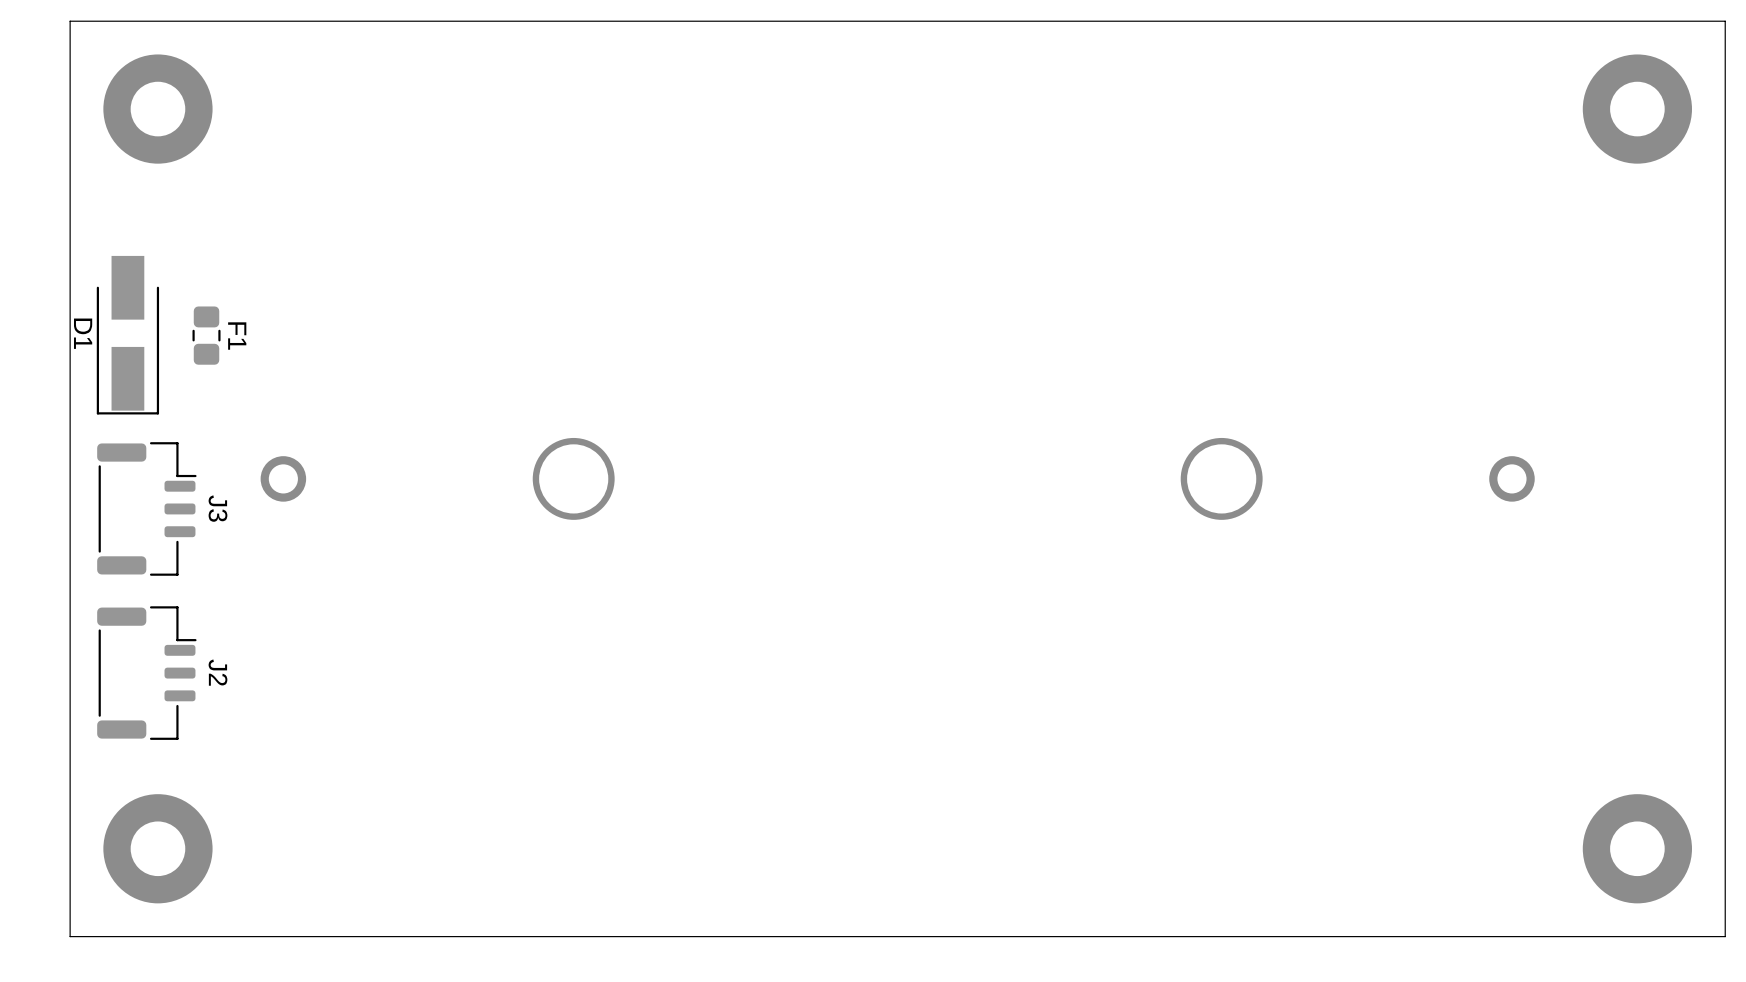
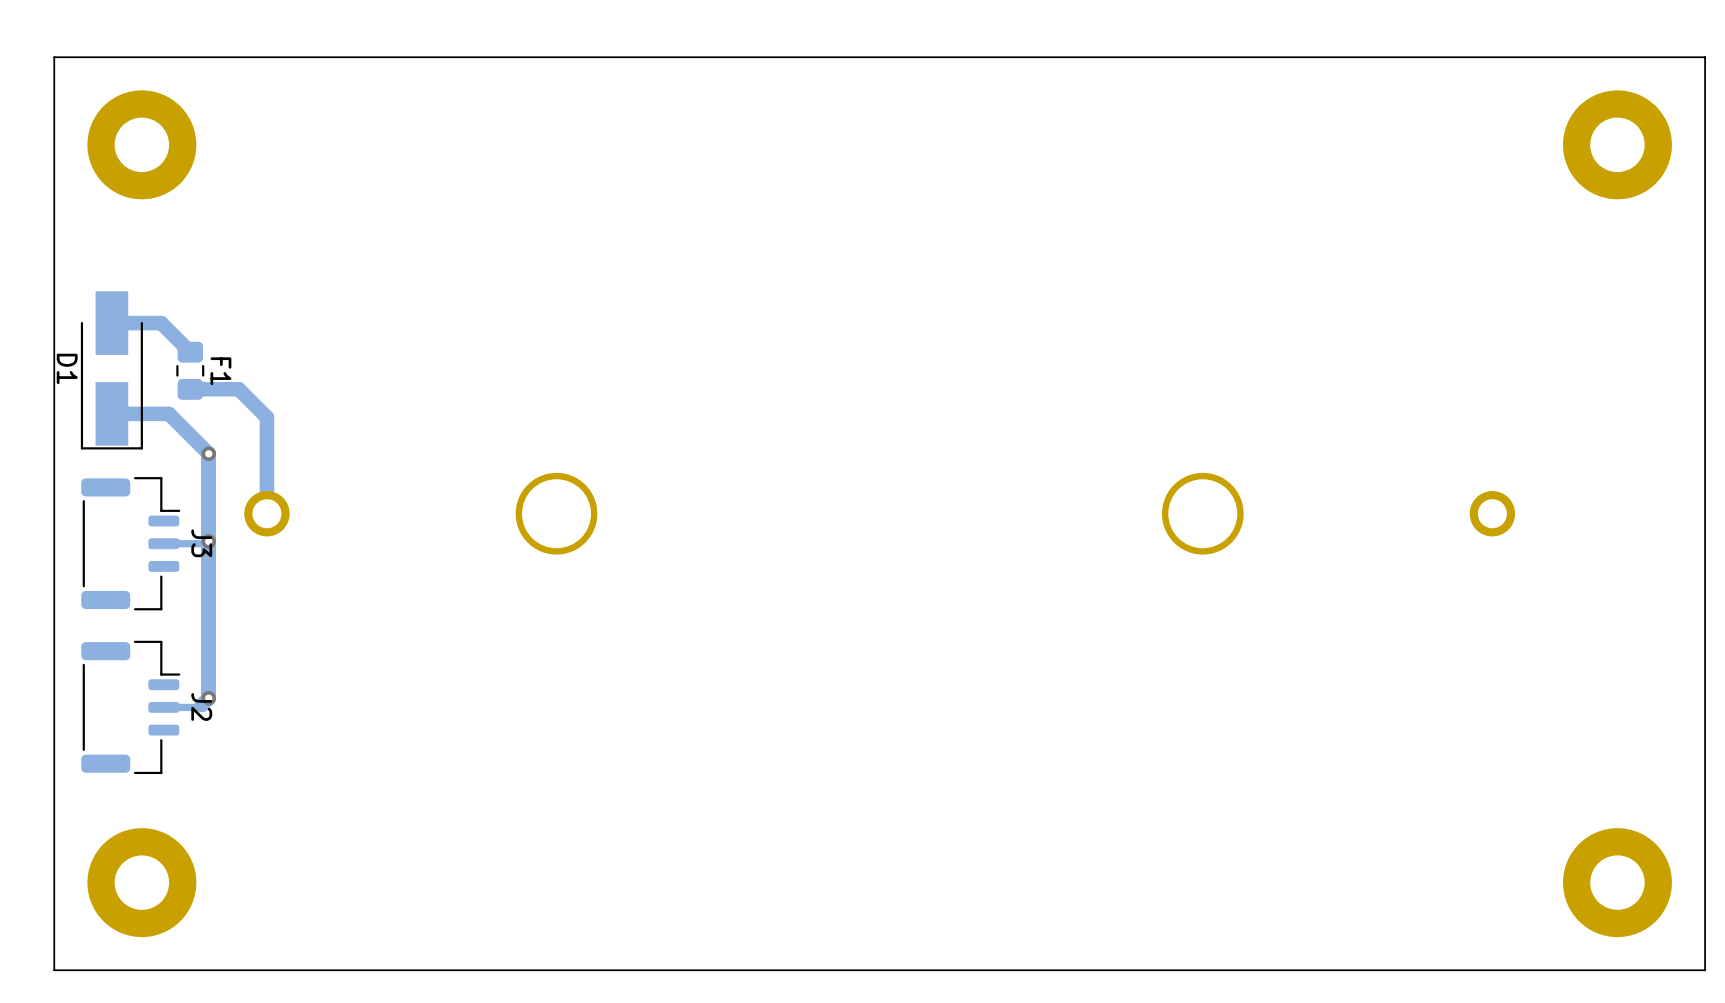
track: none -> (111, 323) (161, 323) (190, 352)
track: none -> (190, 389) (238, 389) (266, 417) (266, 513)
track: none -> (111, 413) (168, 413) (208, 453) (208, 698) (199, 707) (163, 707)
via: none -> (208, 453)
track: none -> (208, 539) (204, 543) (163, 543)
via: none -> (208, 541)
via: none -> (208, 698)

